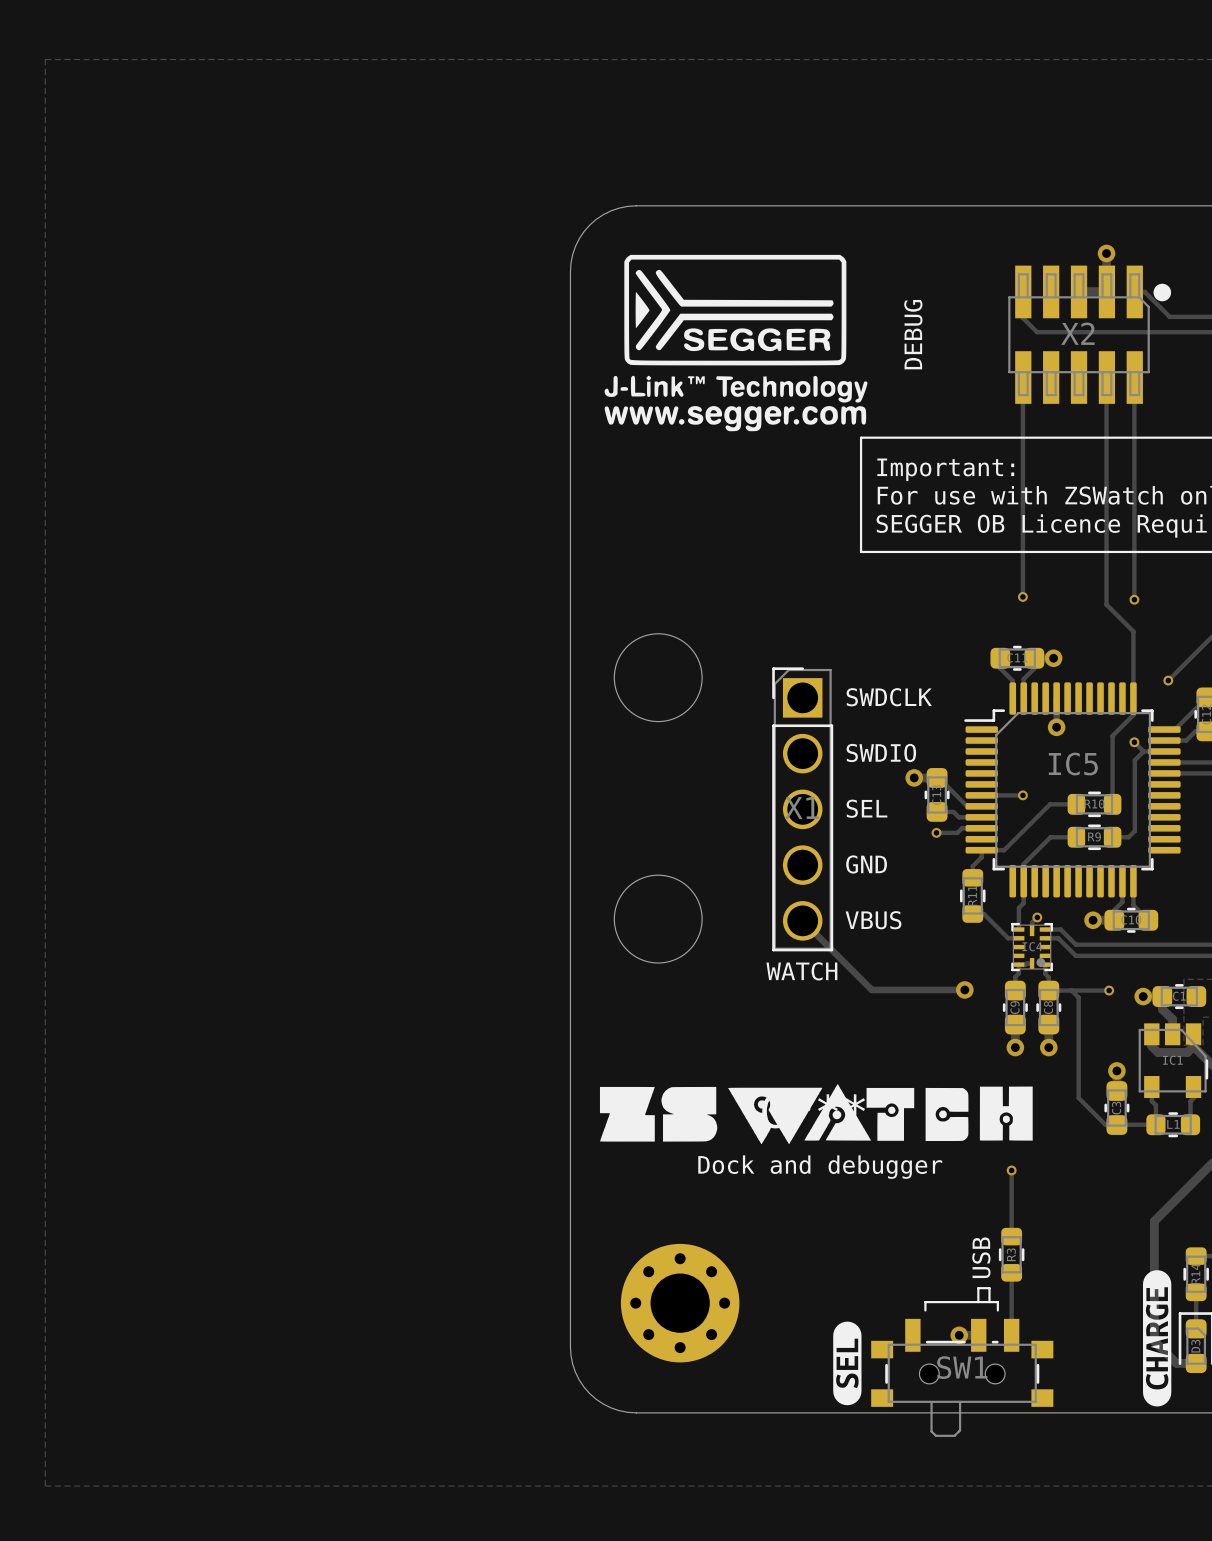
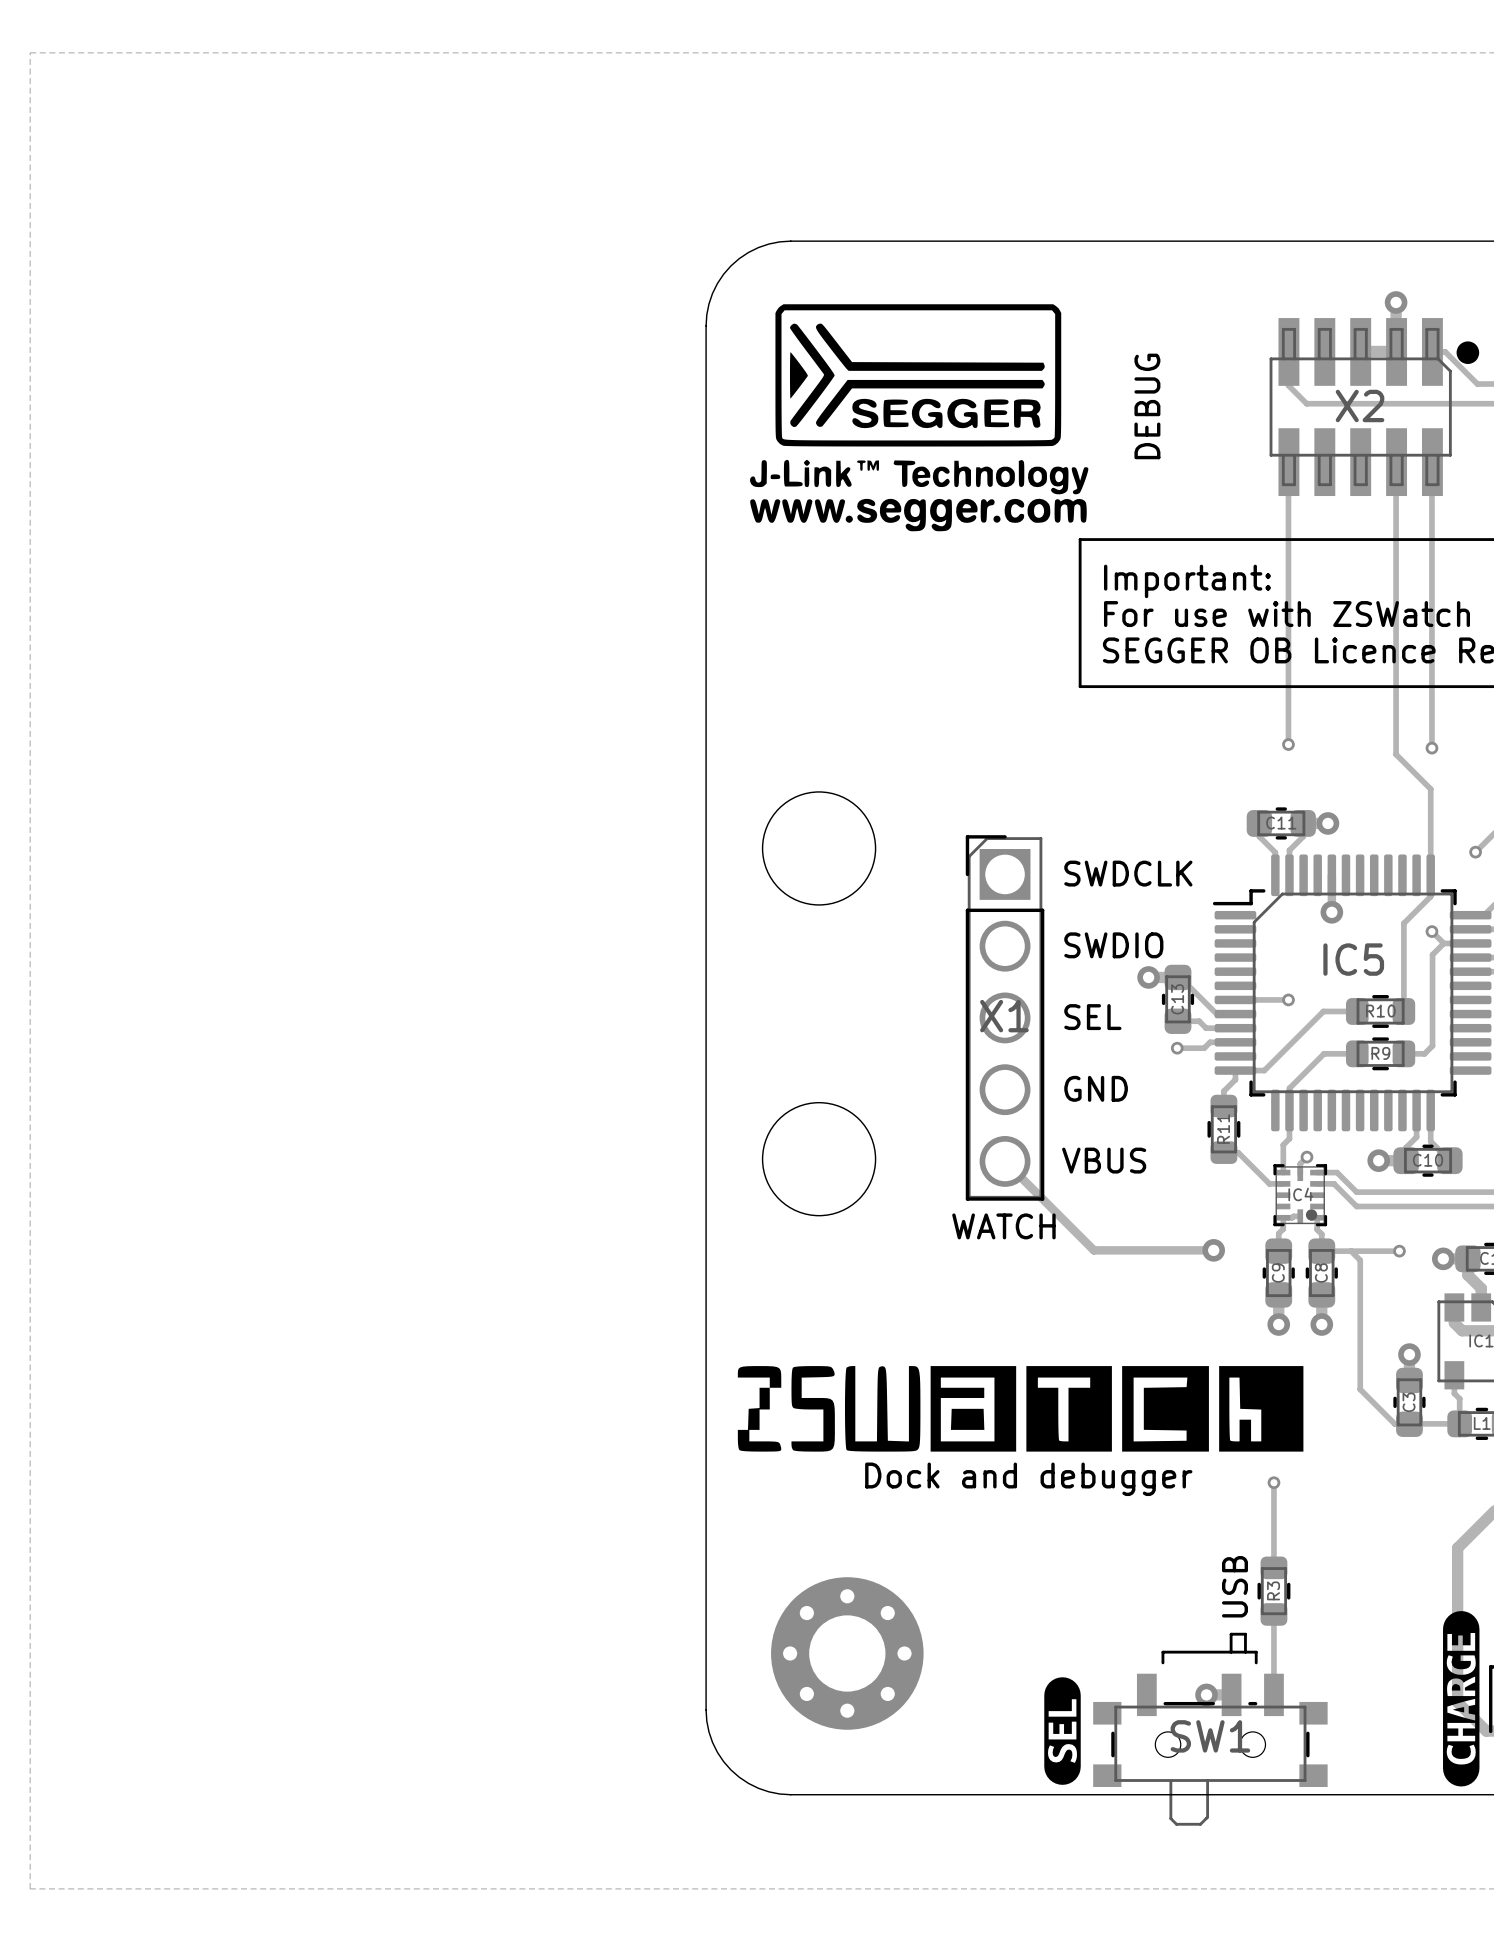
drawing: none -> [737, 1366, 1304, 1452]
part: (816, 1114) -> none

